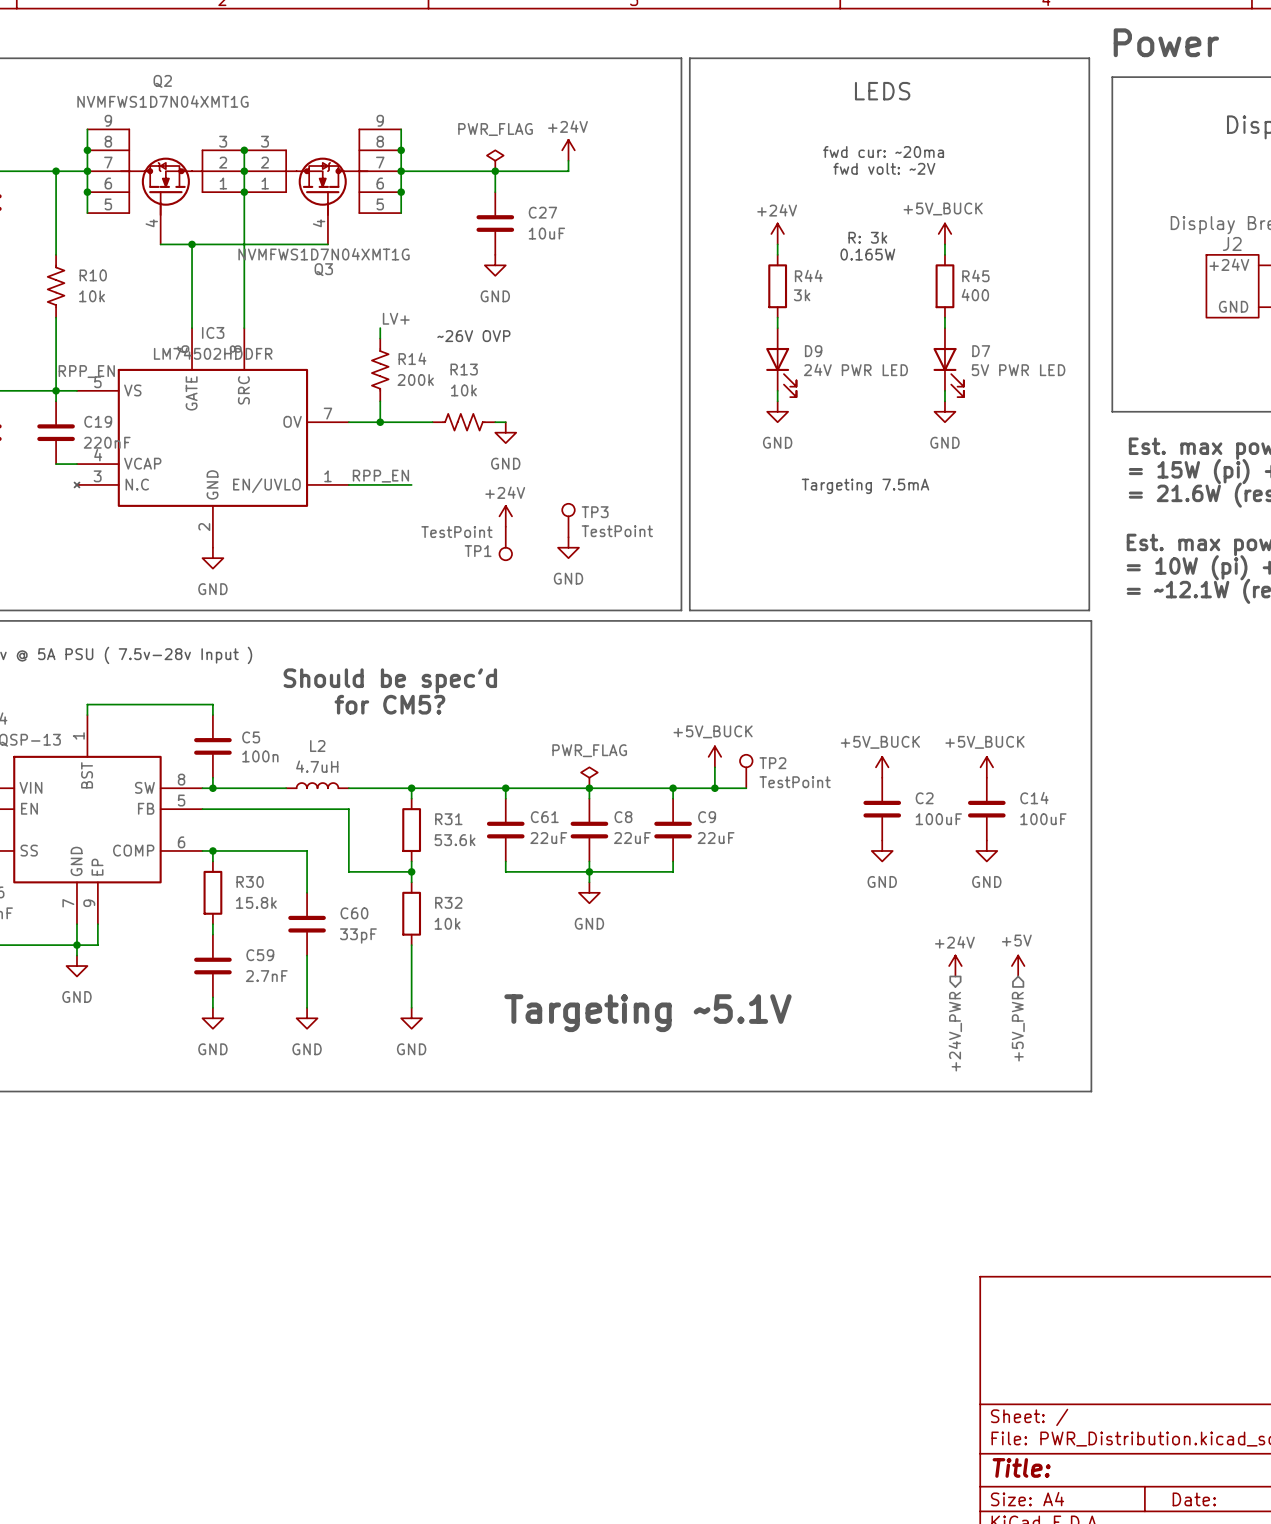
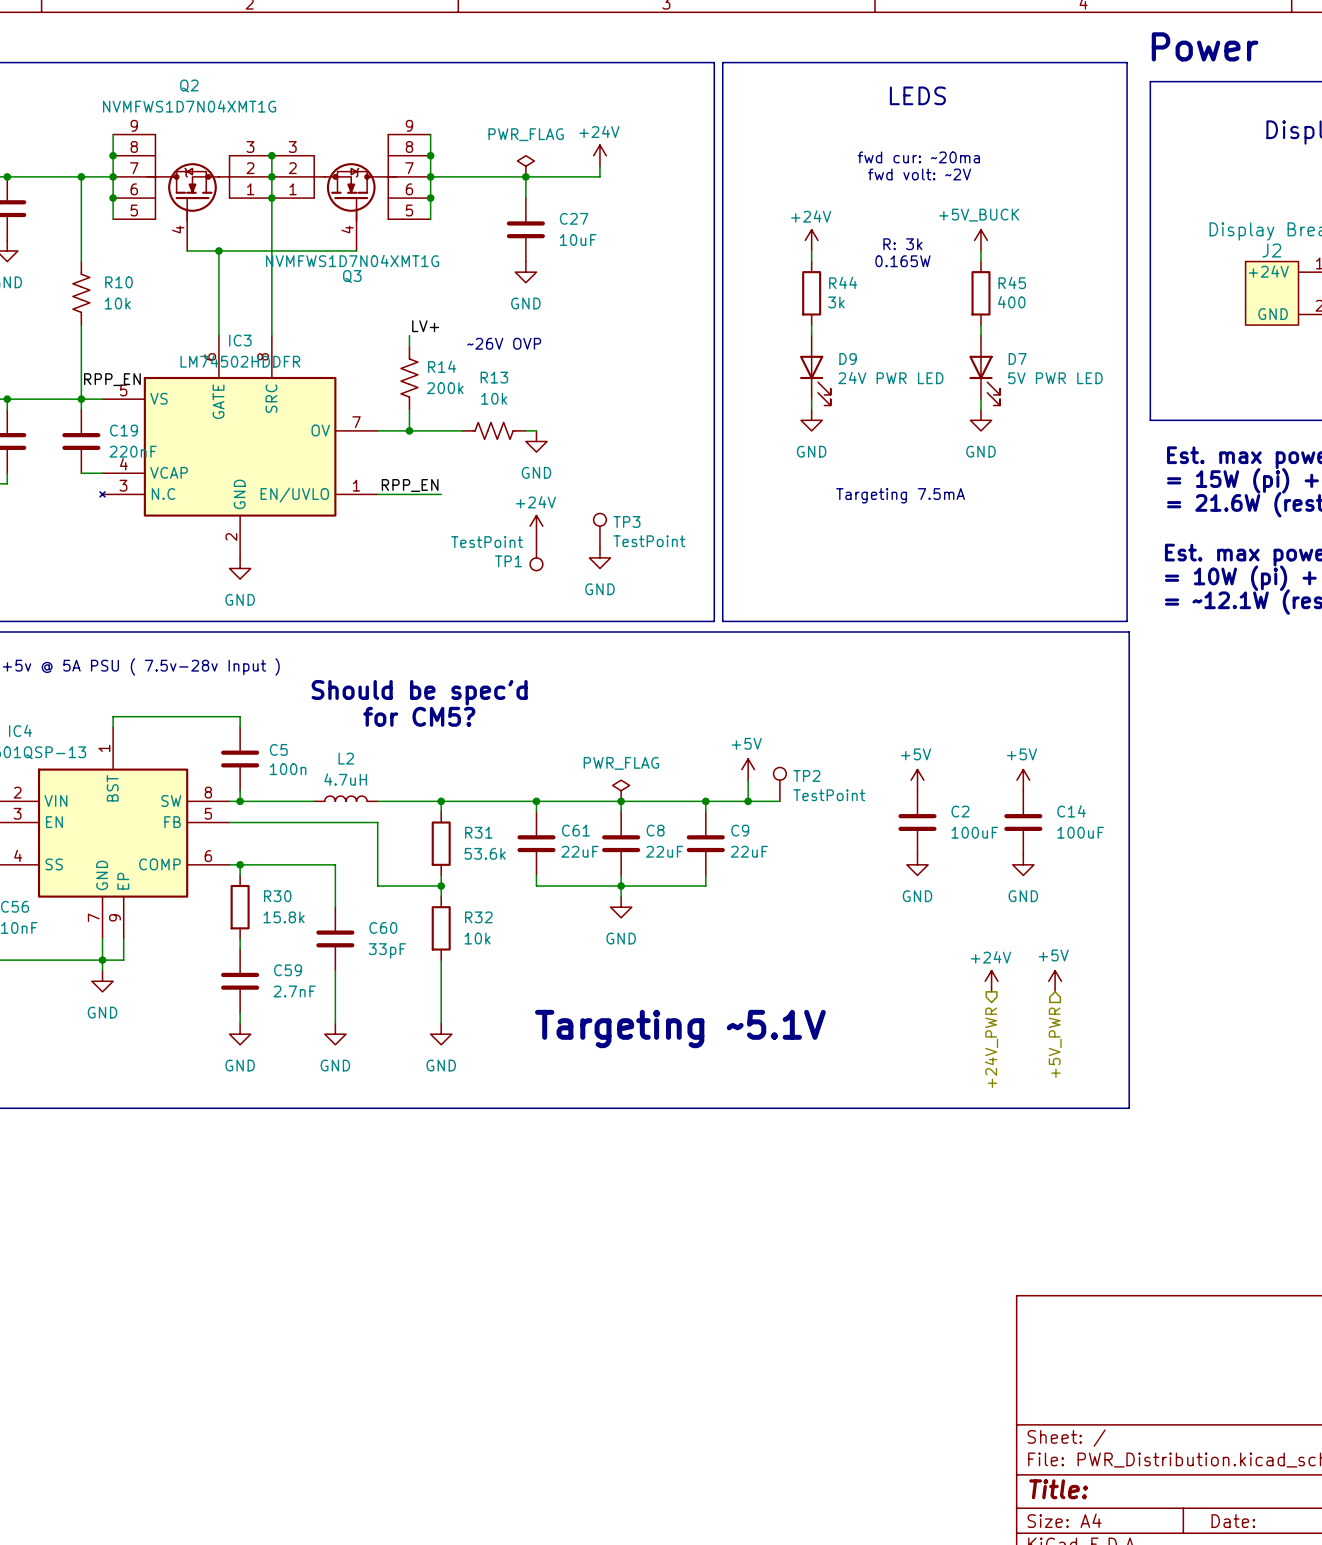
power symbol: +5V_BUCK (714, 756) -> +5V (748, 769)
power symbol: +5V_BUCK (882, 767) -> +5V (917, 780)
power symbol: +5V_BUCK (986, 767) -> +5V (1023, 780)

